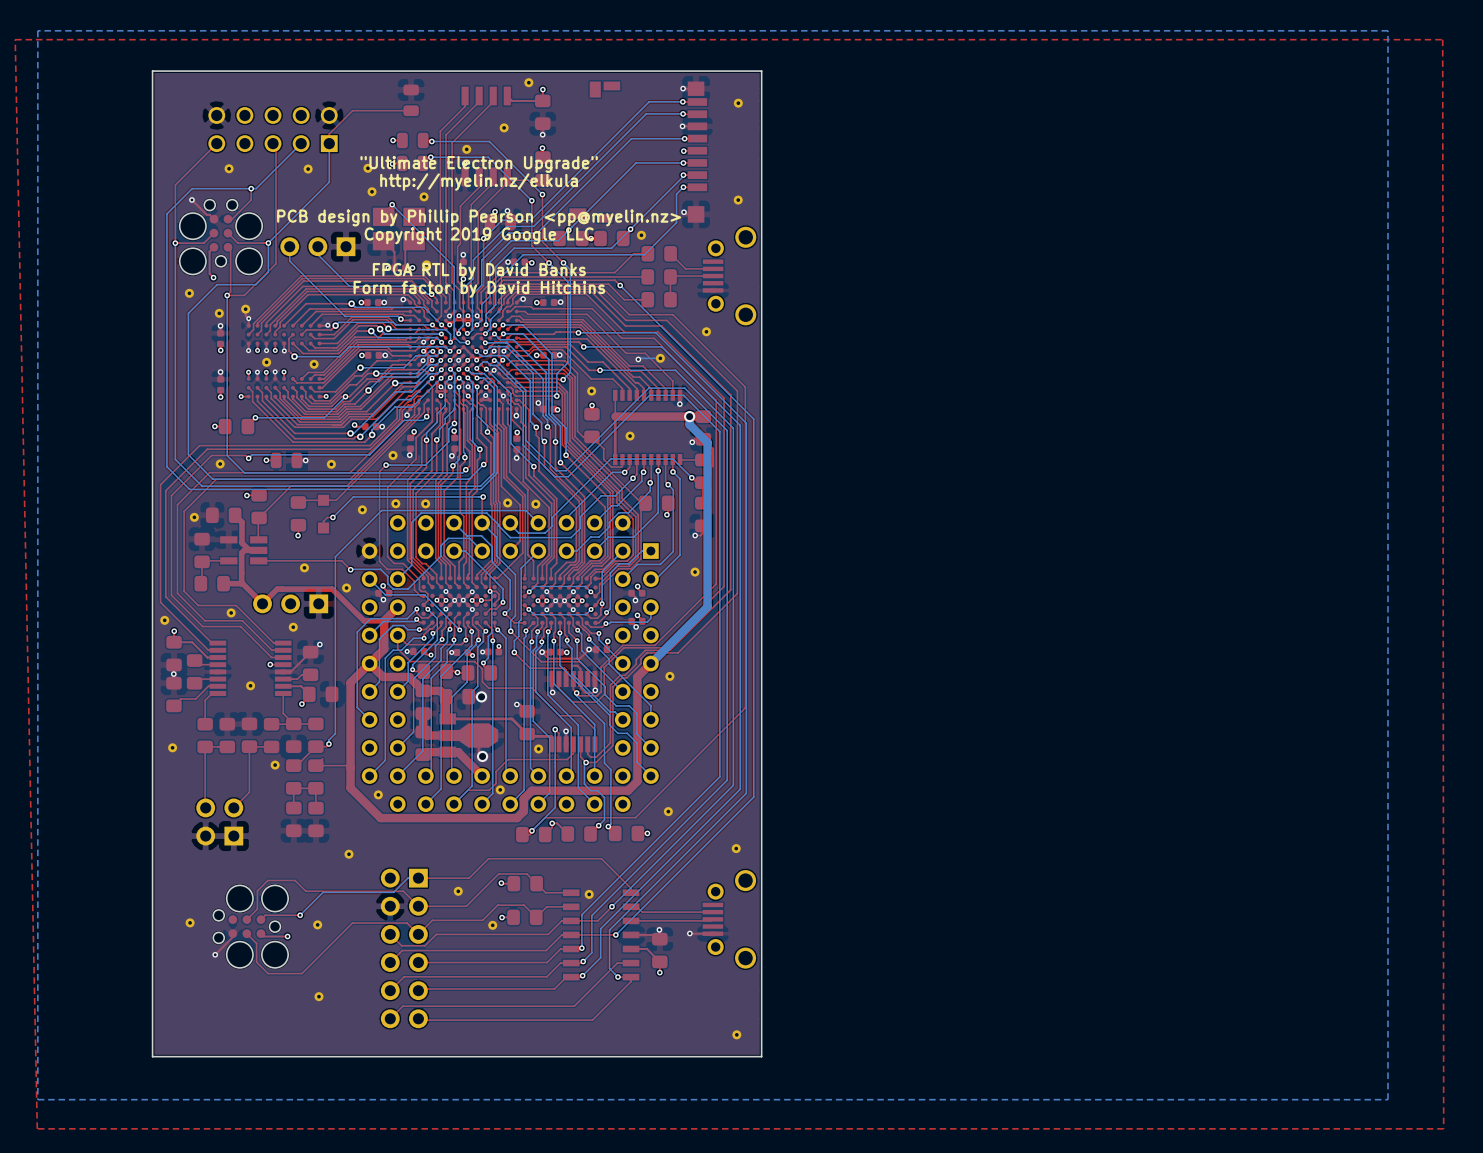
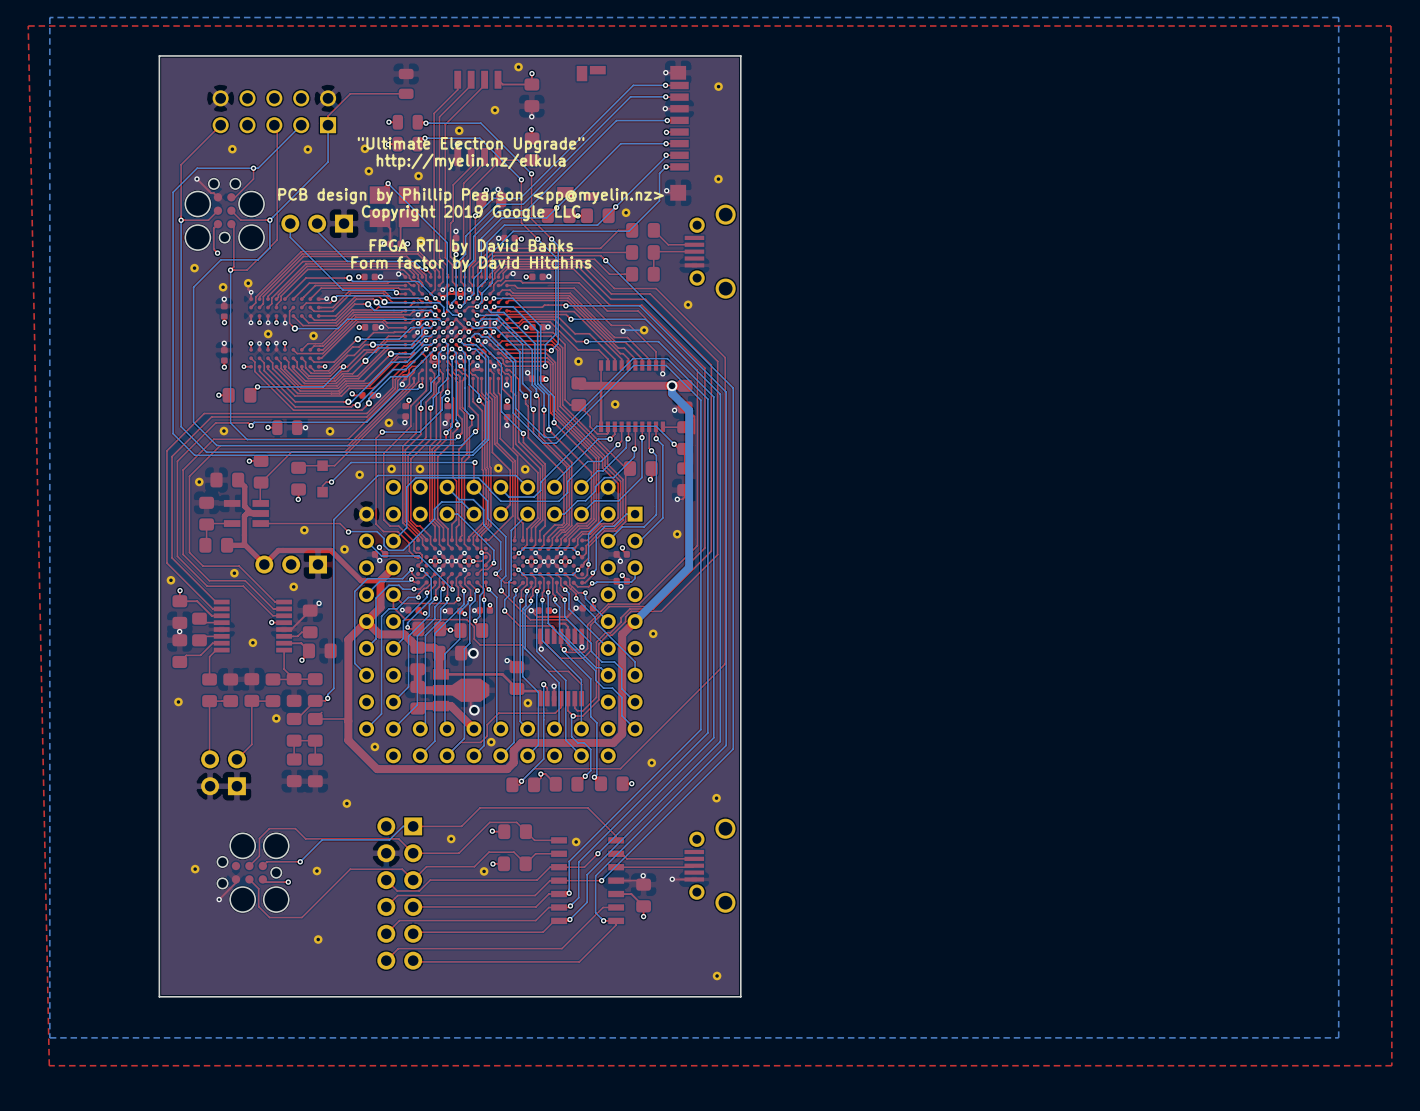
via: (592, 405) -> none
top track: none -> (601, 385) (581, 385)

